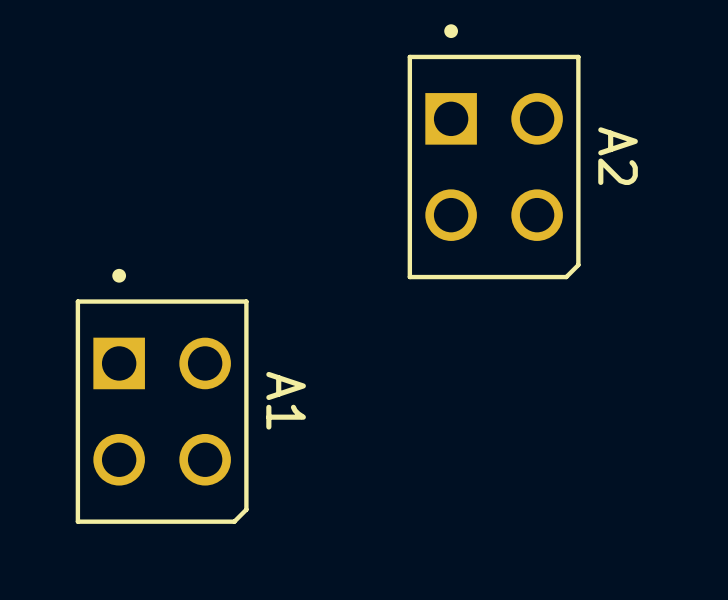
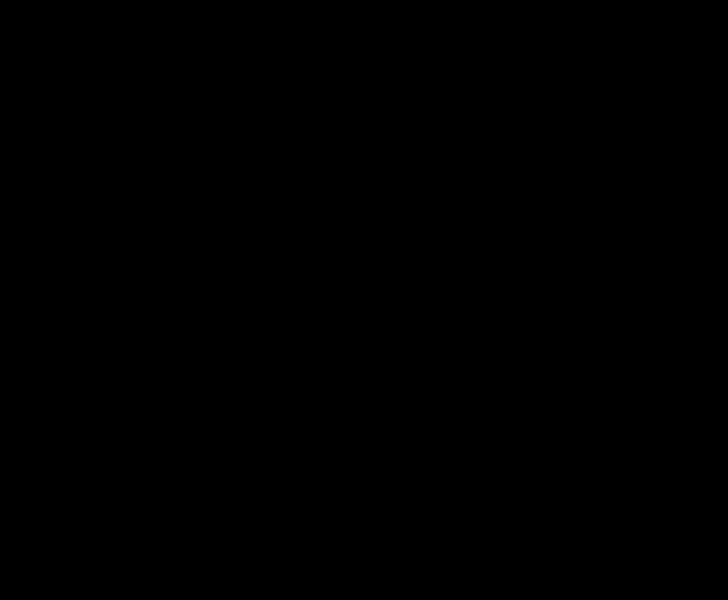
A2: (494, 151) -> none
A1: (162, 396) -> none

